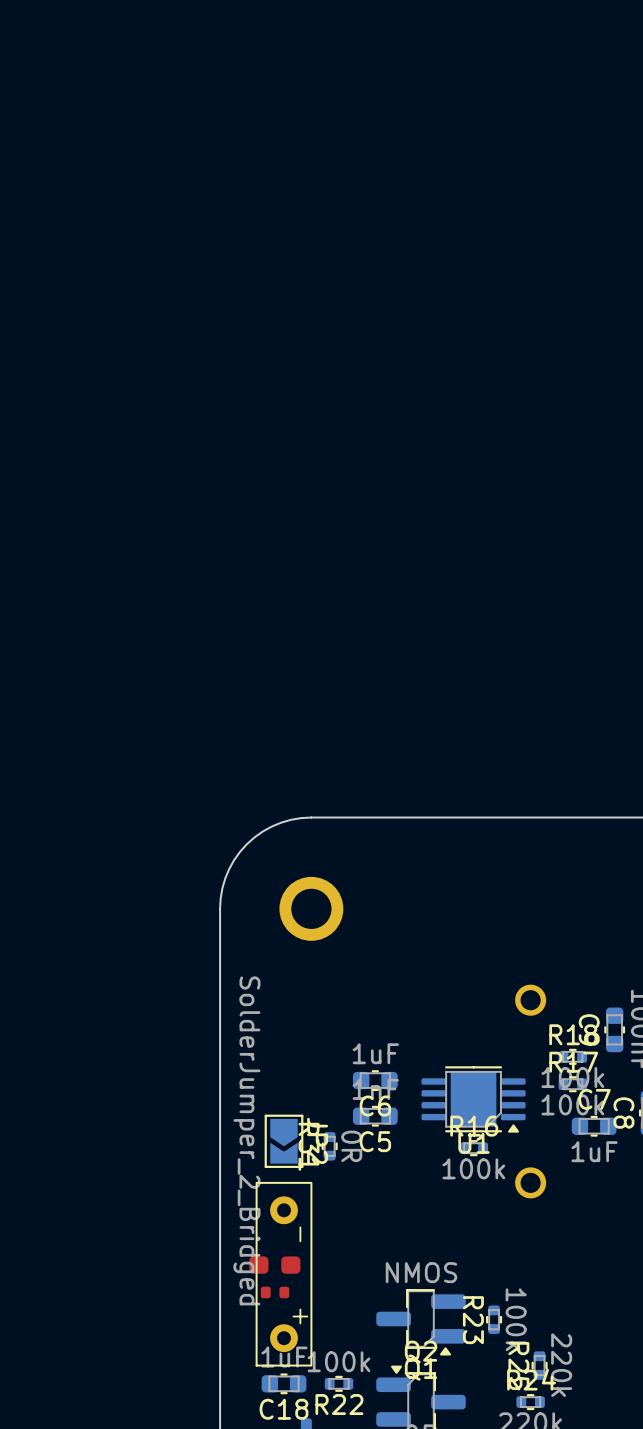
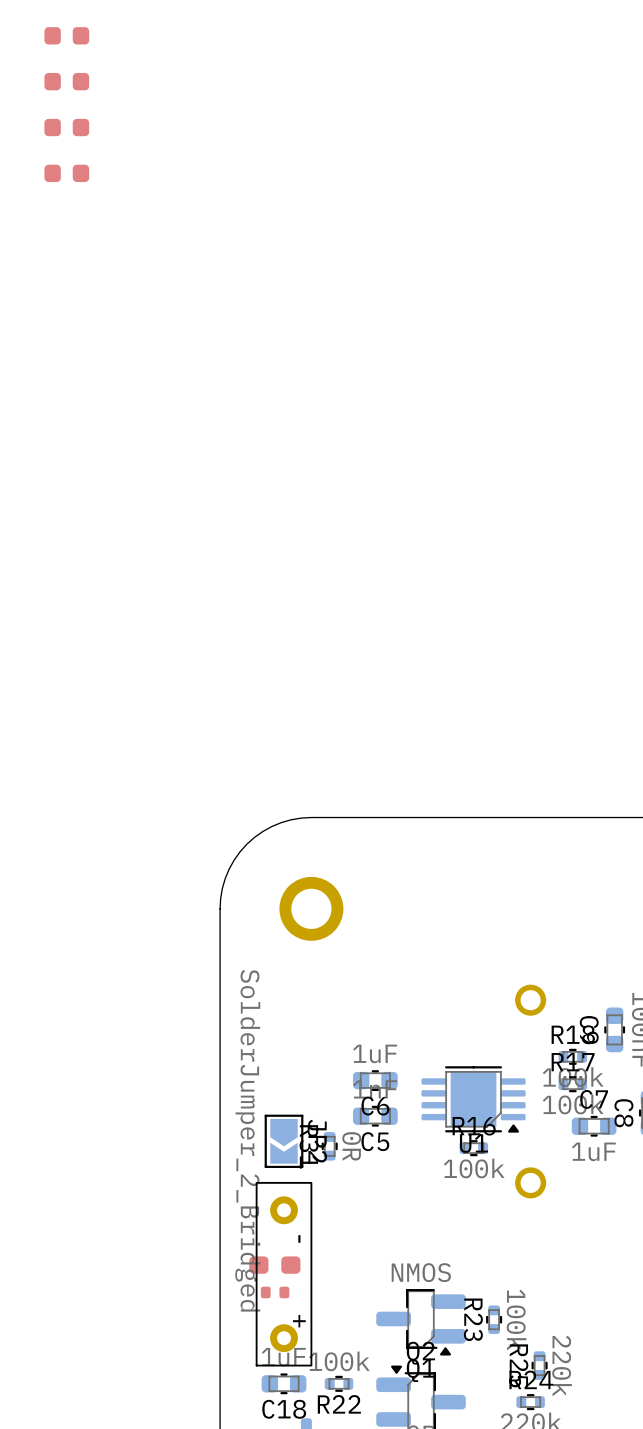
part: none -> (66, 35)
part: none -> (66, 81)
part: none -> (66, 127)
part: none -> (66, 173)

